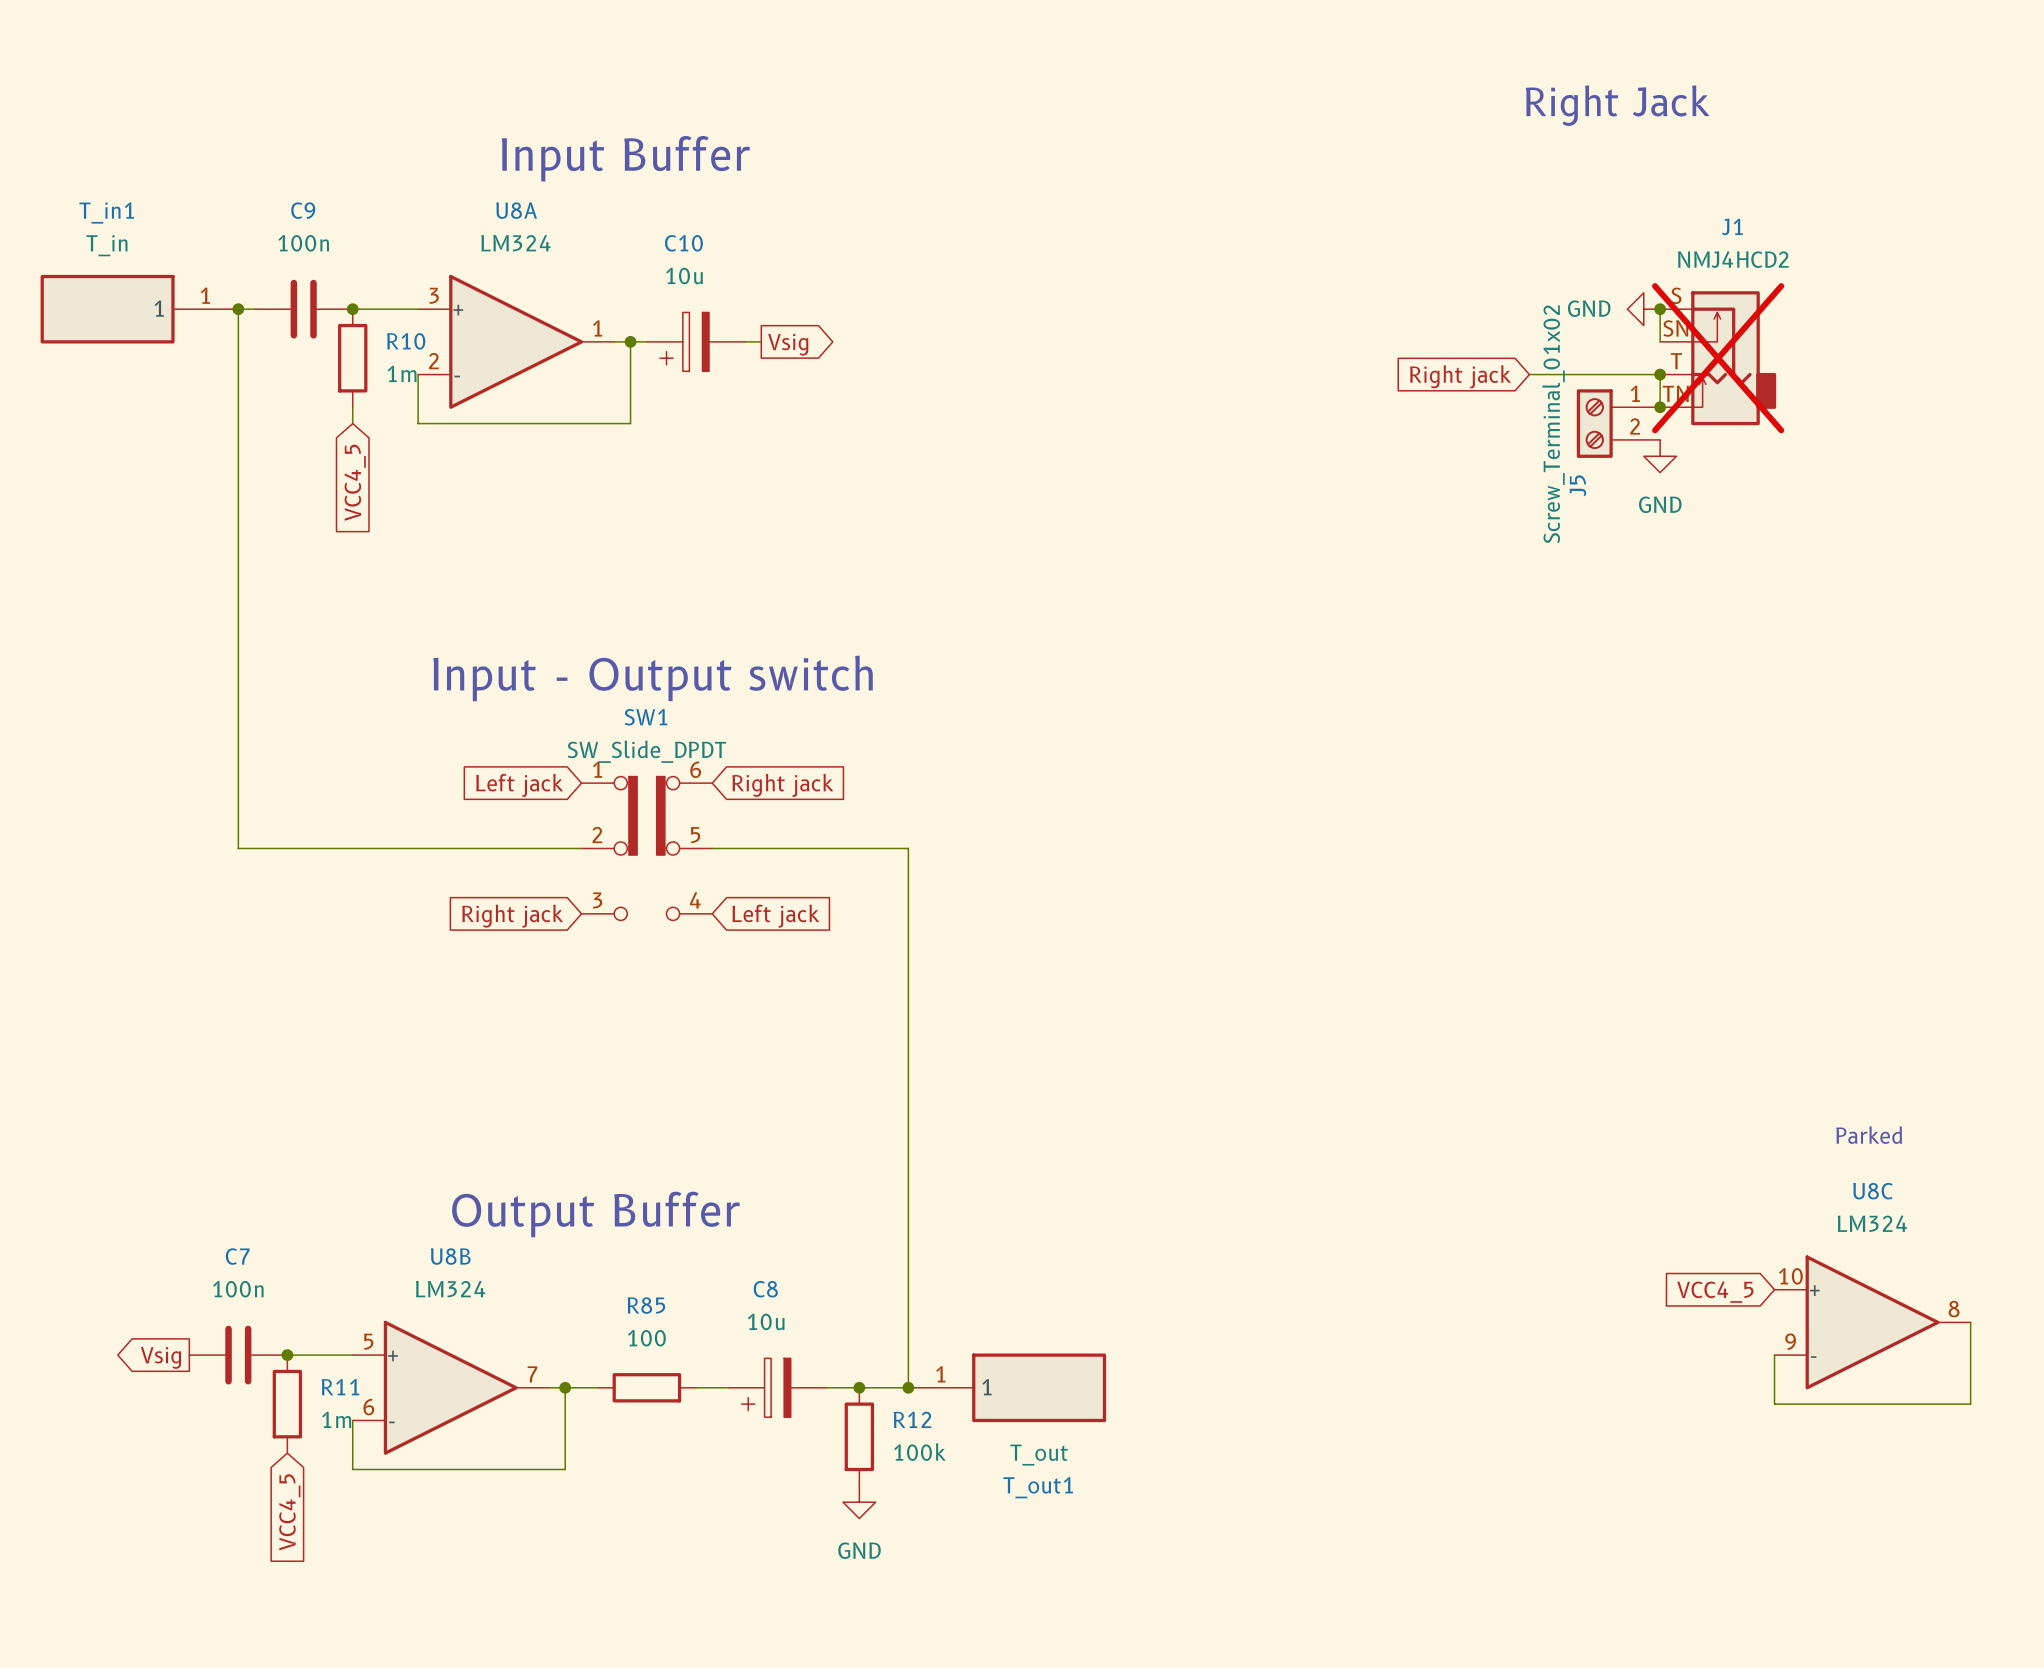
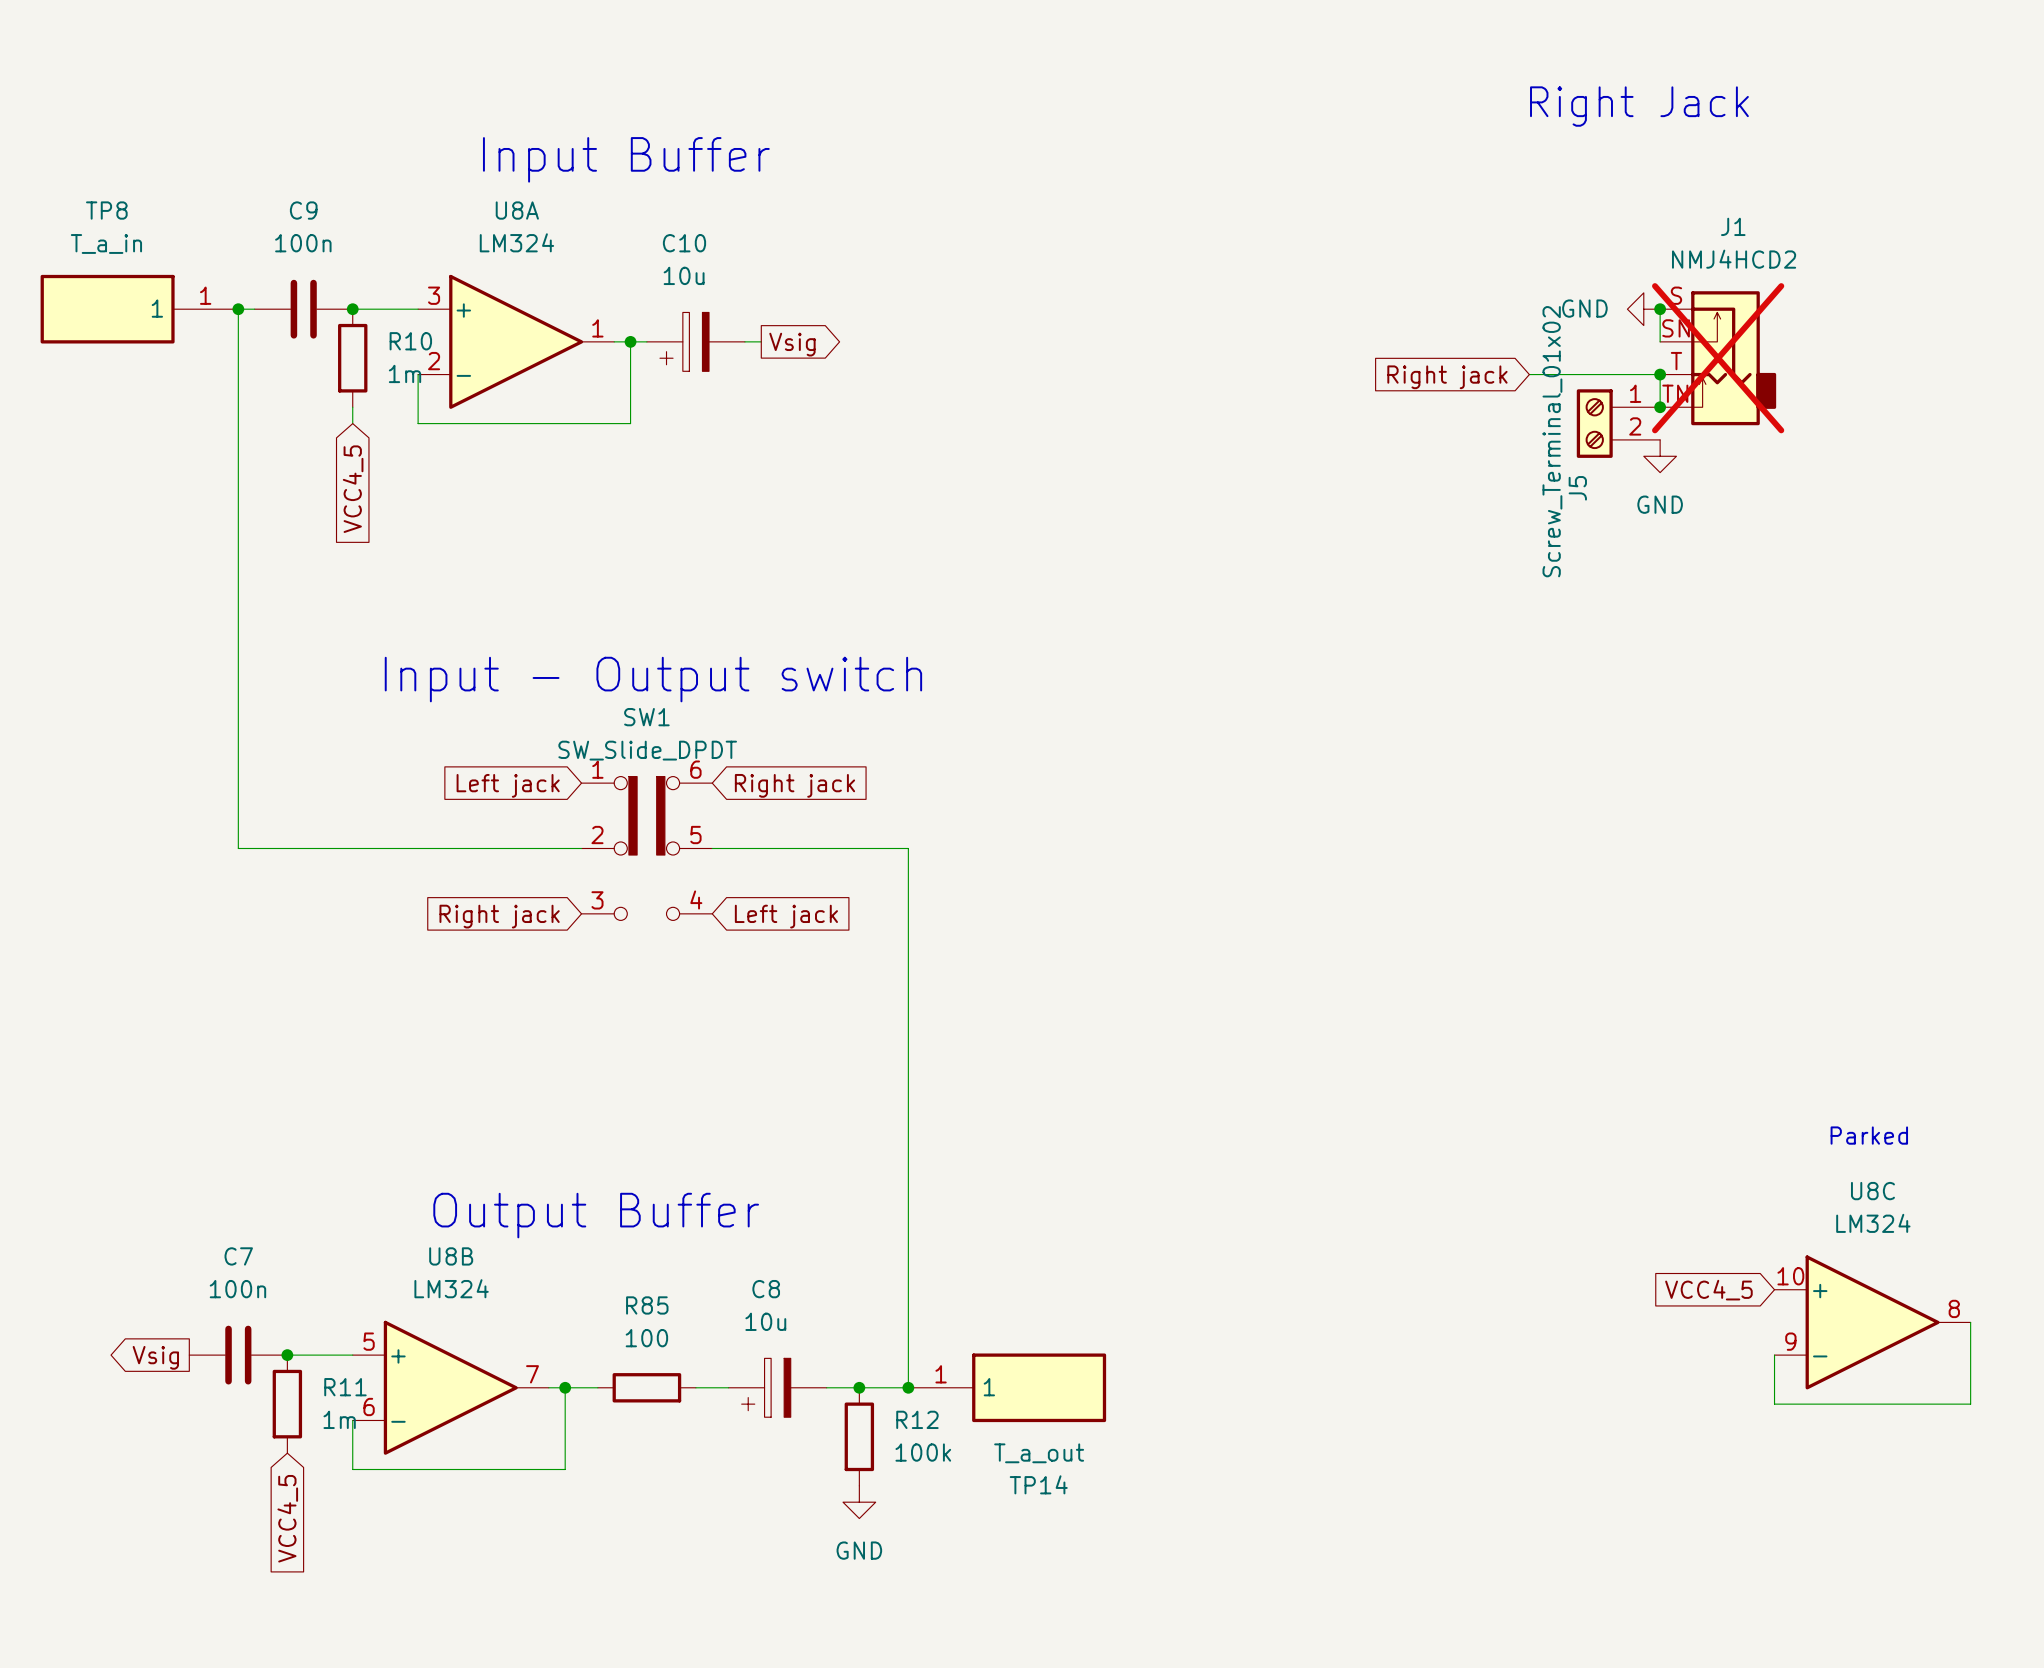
T_in1 name: T_in1 (106, 212) -> TP8 (106, 210)
T_in1 value: T_in (106, 245) -> T_a_in (106, 243)
T_out1 value: T_out (1039, 1455) -> T_a_out (1039, 1453)
T_out1 name: T_out1 (1038, 1487) -> TP14 (1038, 1484)

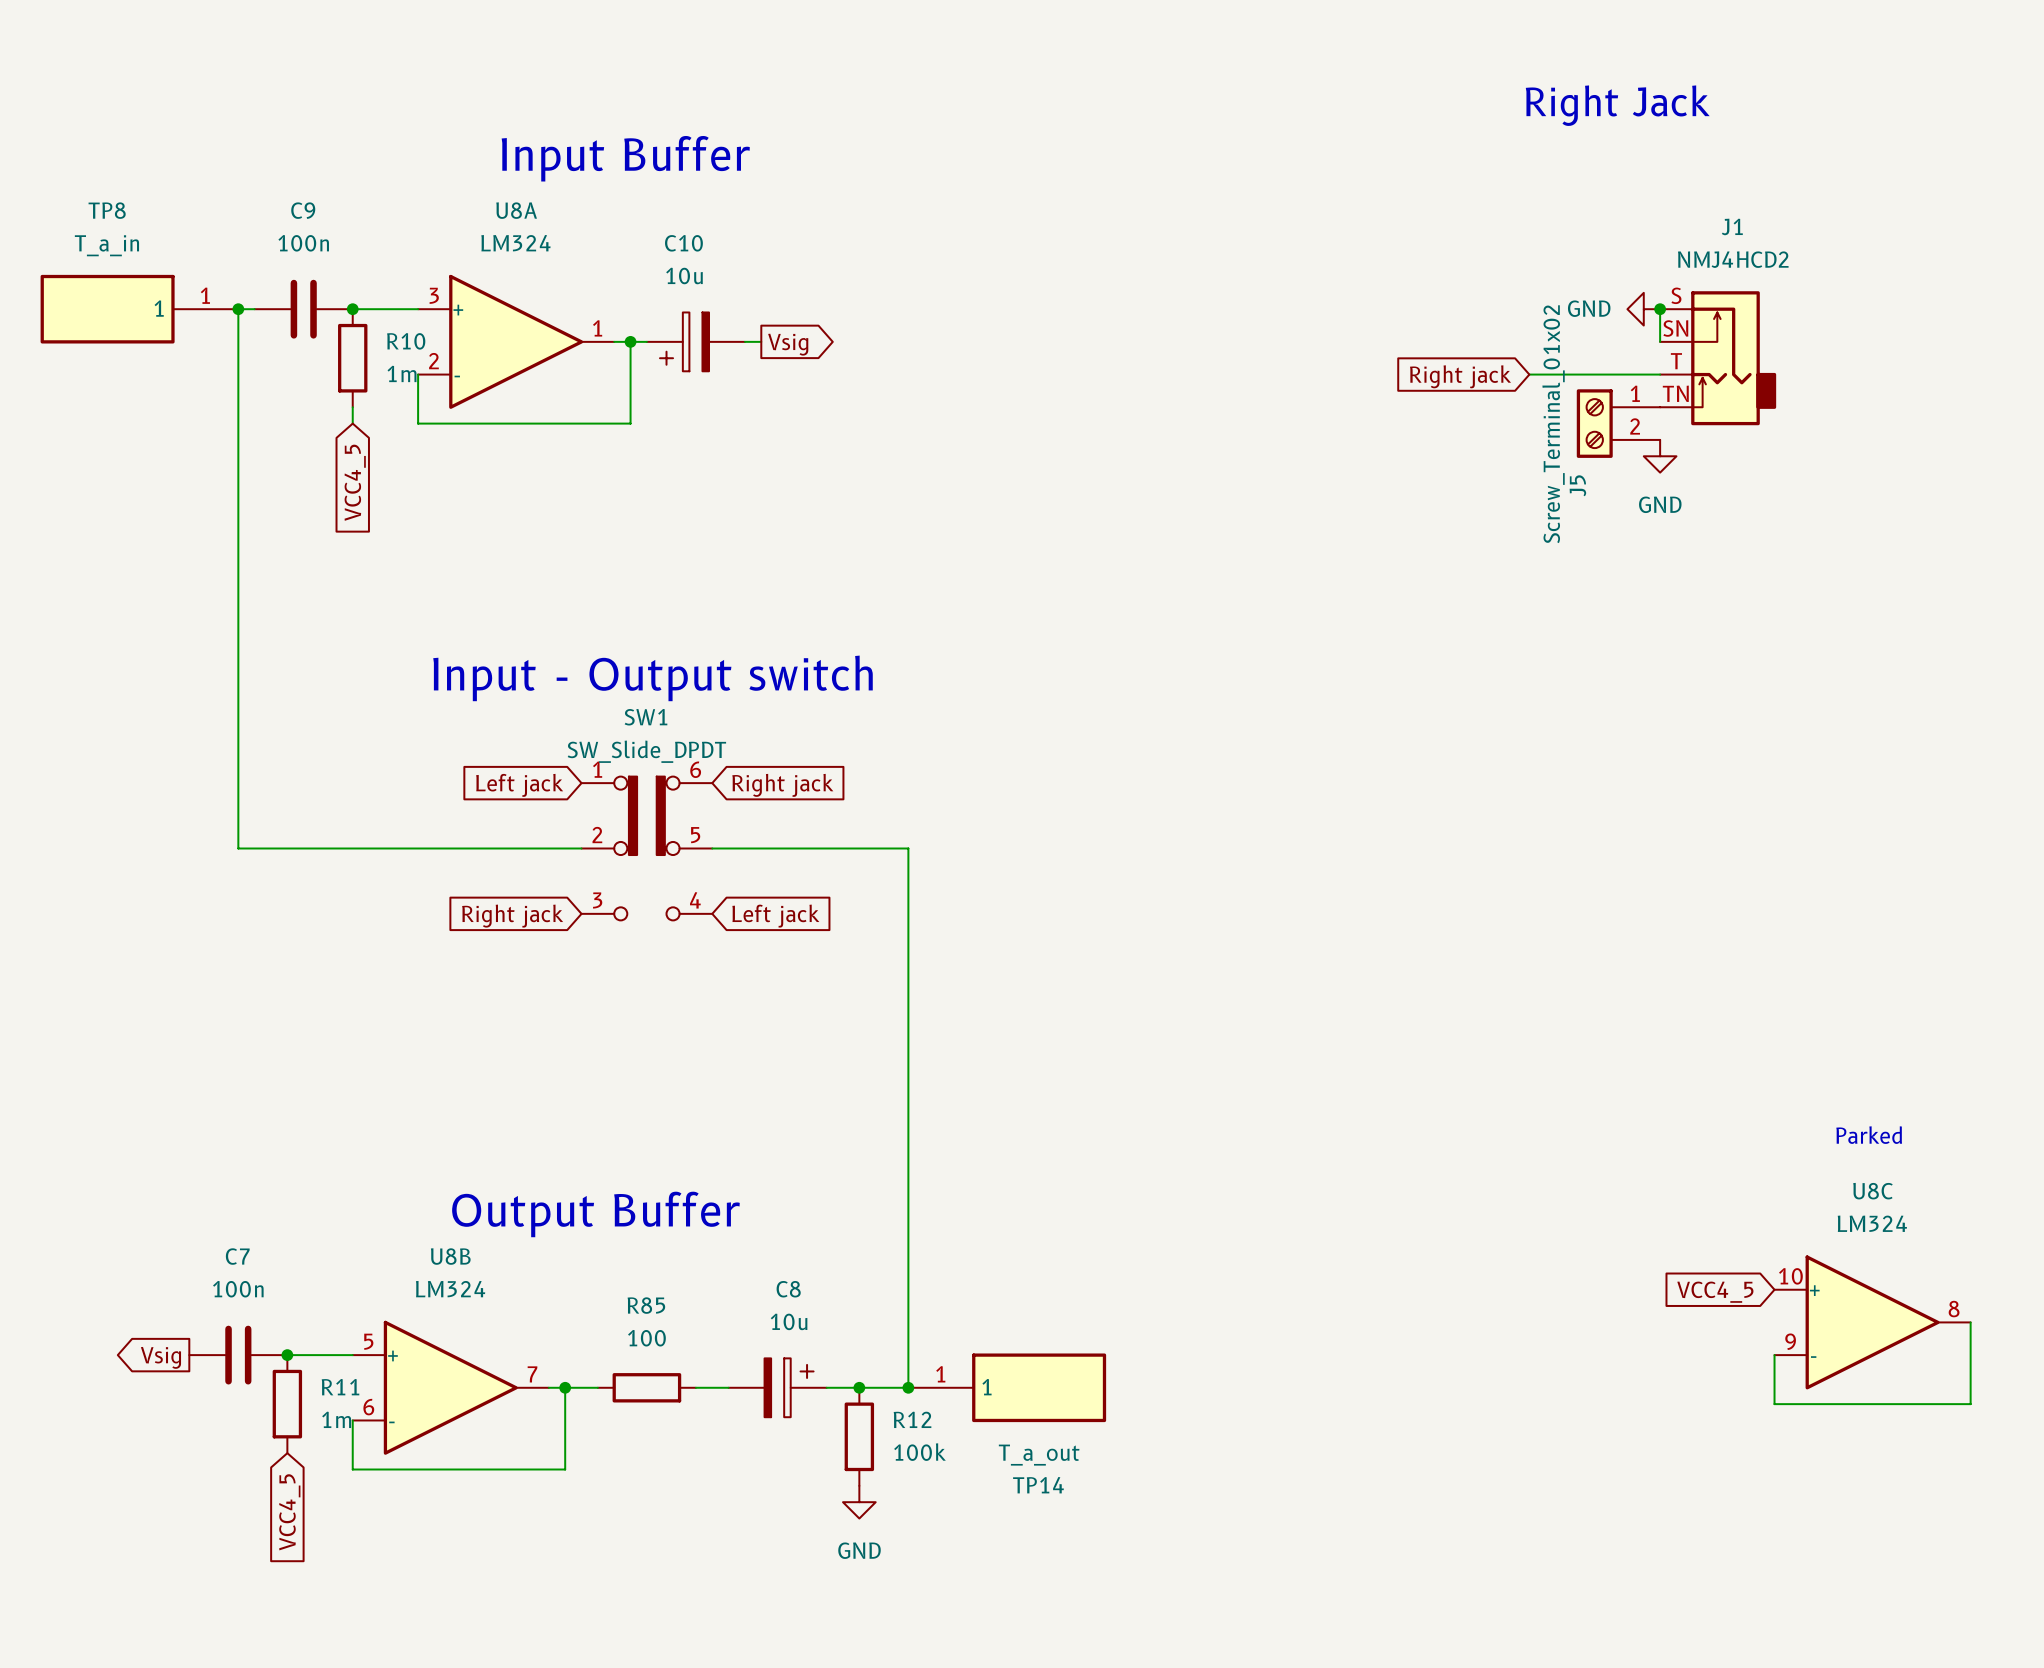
J1 do-not-place cross: (1718, 358) -> none
wire: (1660, 374) (1660, 407) -> none
junction: (1660, 374) -> none
junction: (1660, 407) -> none
C8 rotation: 0° (766, 1387) -> 180° (789, 1387)

